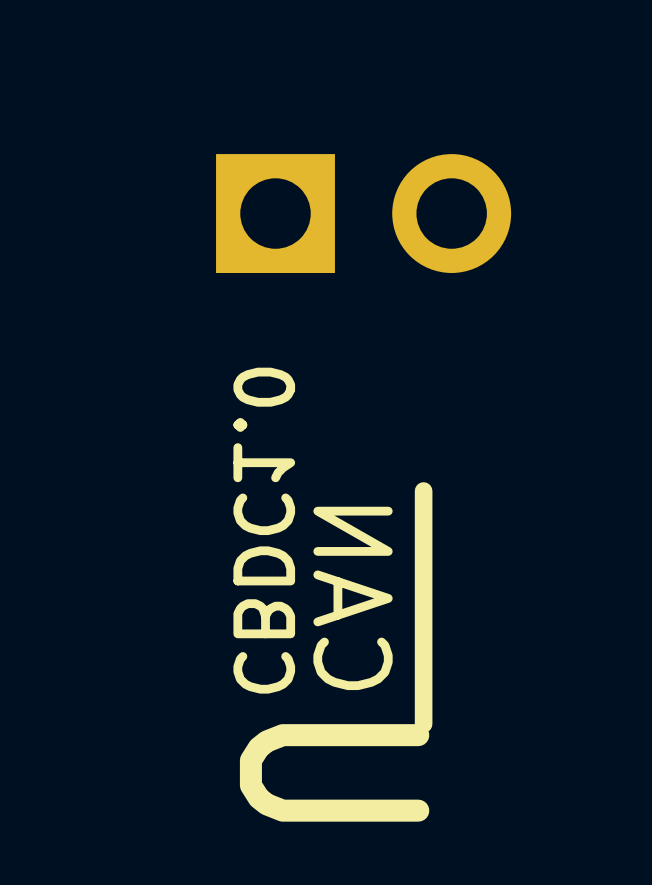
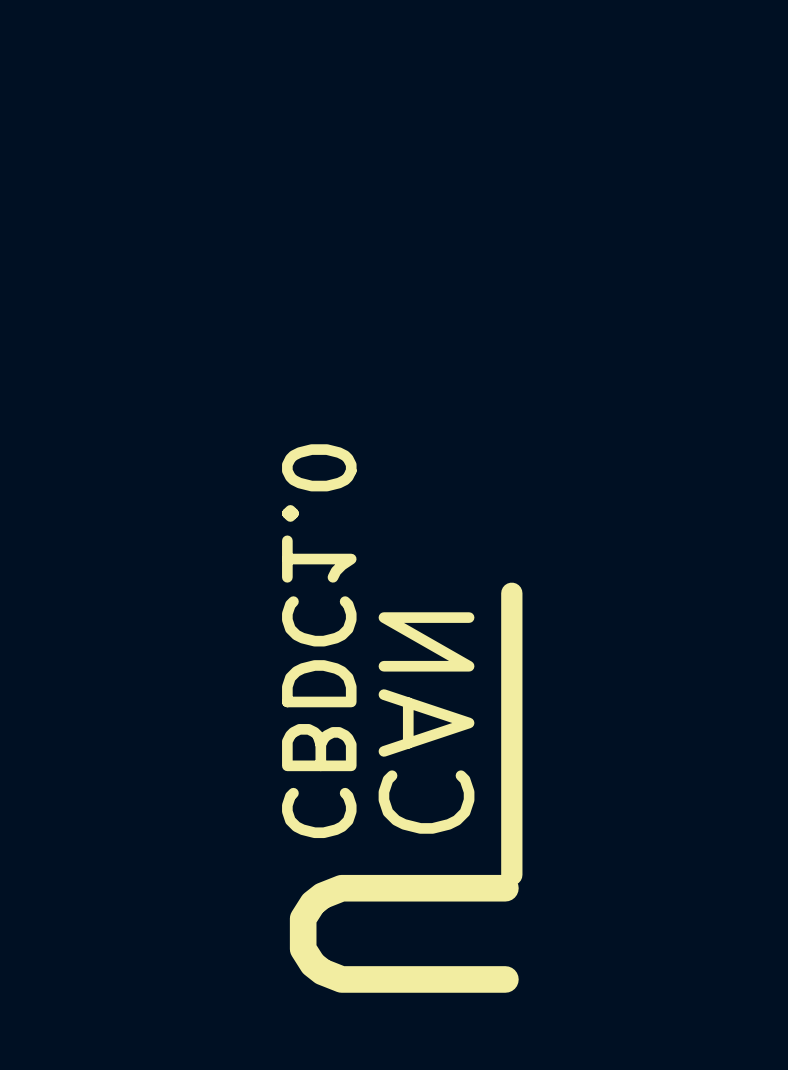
part: (363, 213) -> none

